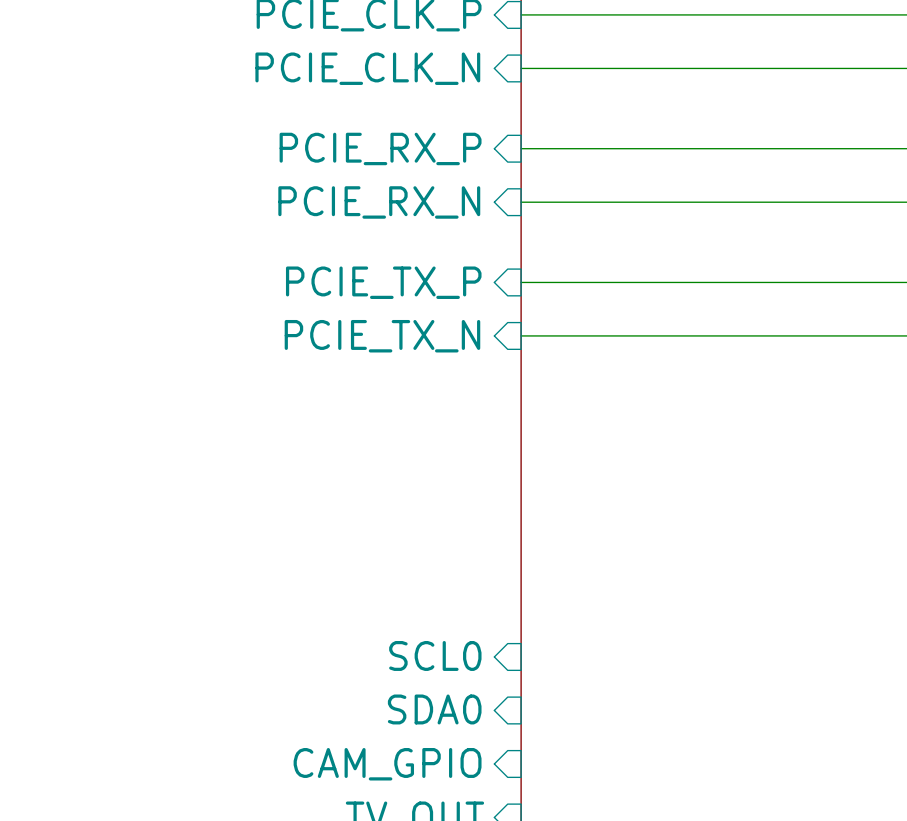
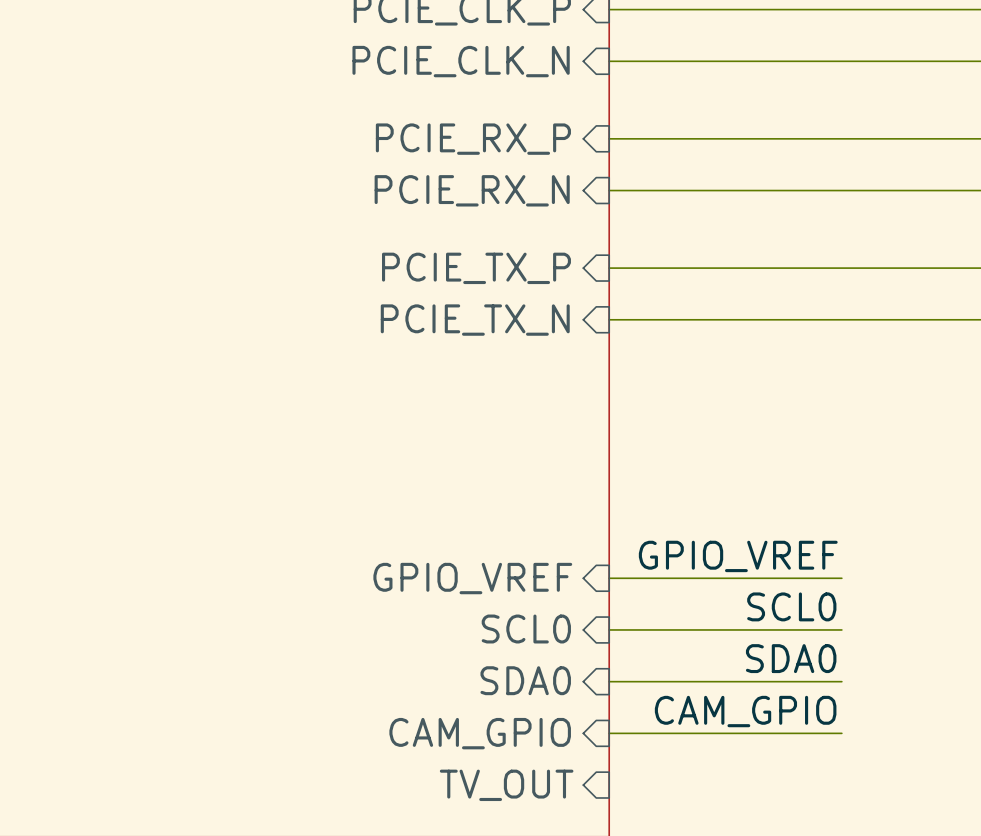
label: none -> GPIO_VREF (738, 556)
sheet pin: none -> GPIO_VREF (472, 578)
wire: none -> (609, 578) (841, 578)
label: none -> SCL0 (791, 606)
wire: none -> (609, 629) (841, 629)
label: none -> SDA0 (791, 658)
wire: none -> (609, 681) (841, 681)
label: none -> CAM_GPIO (745, 711)
wire: none -> (609, 733) (841, 733)

